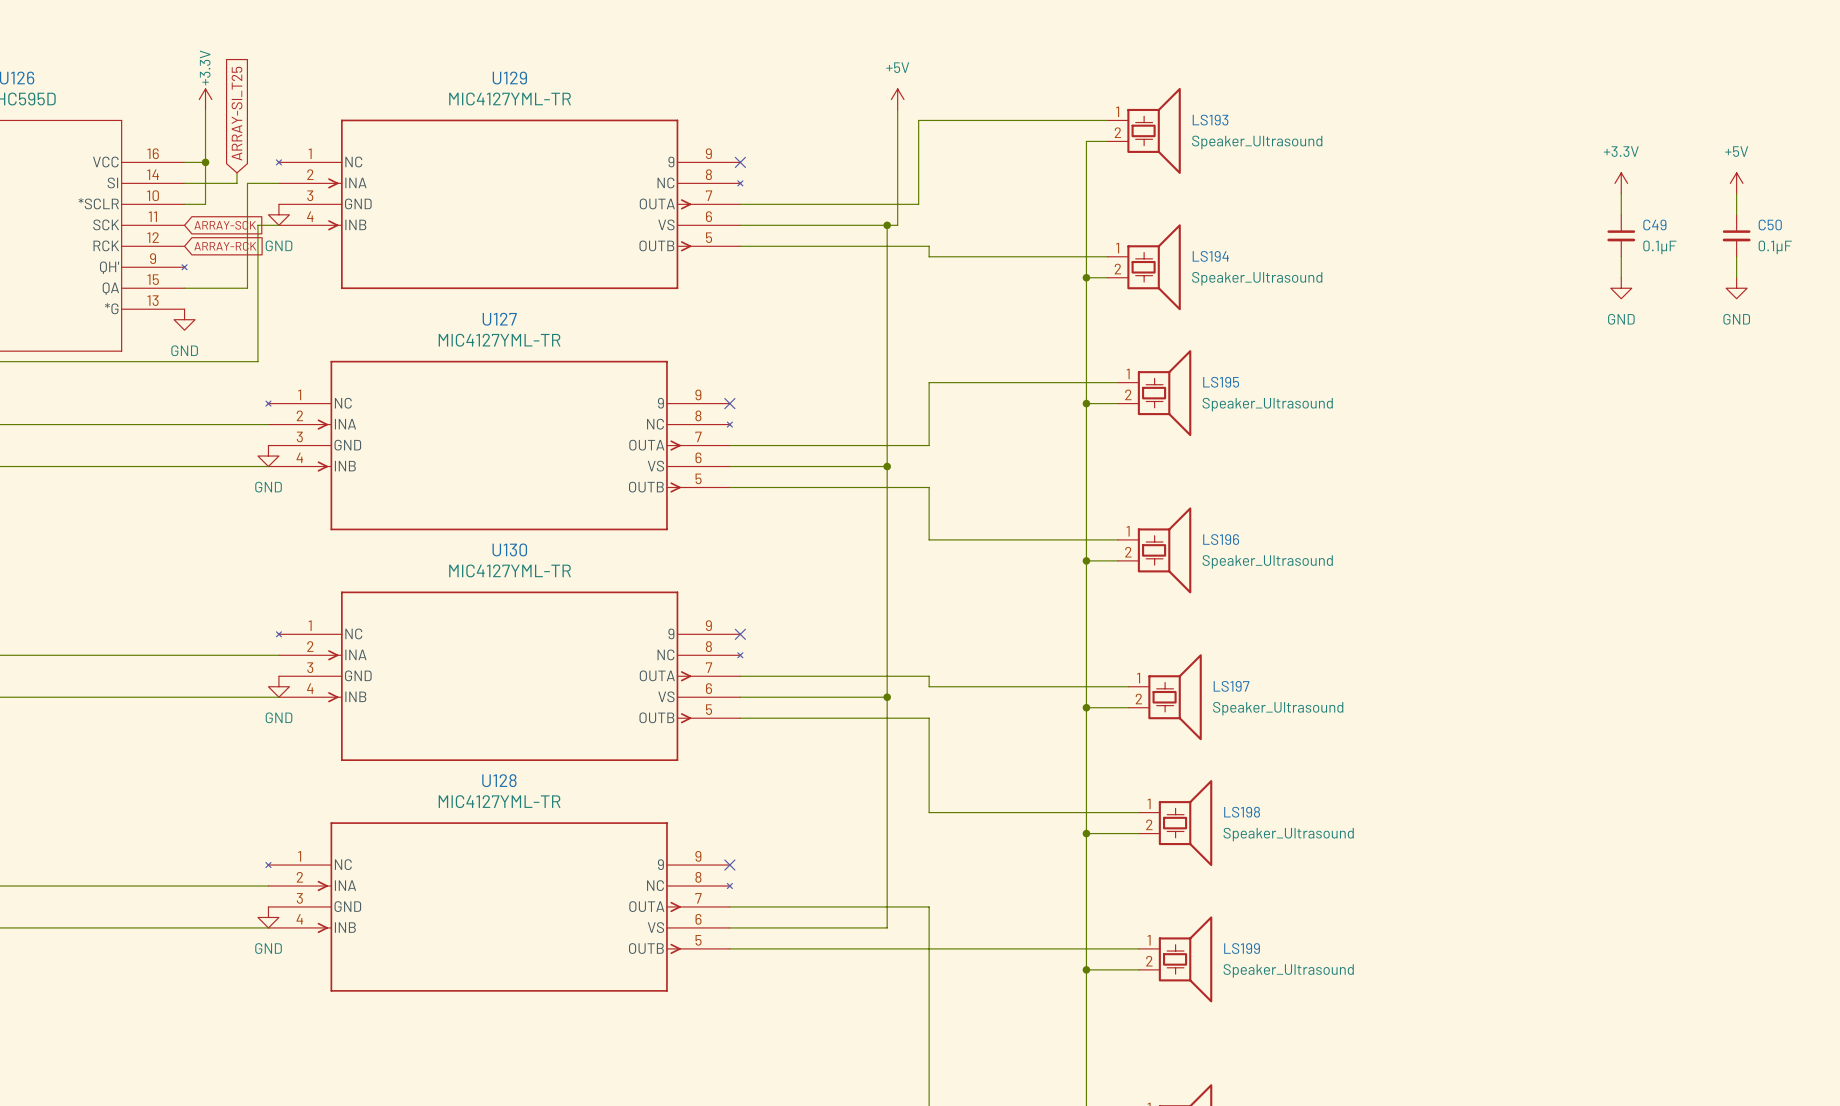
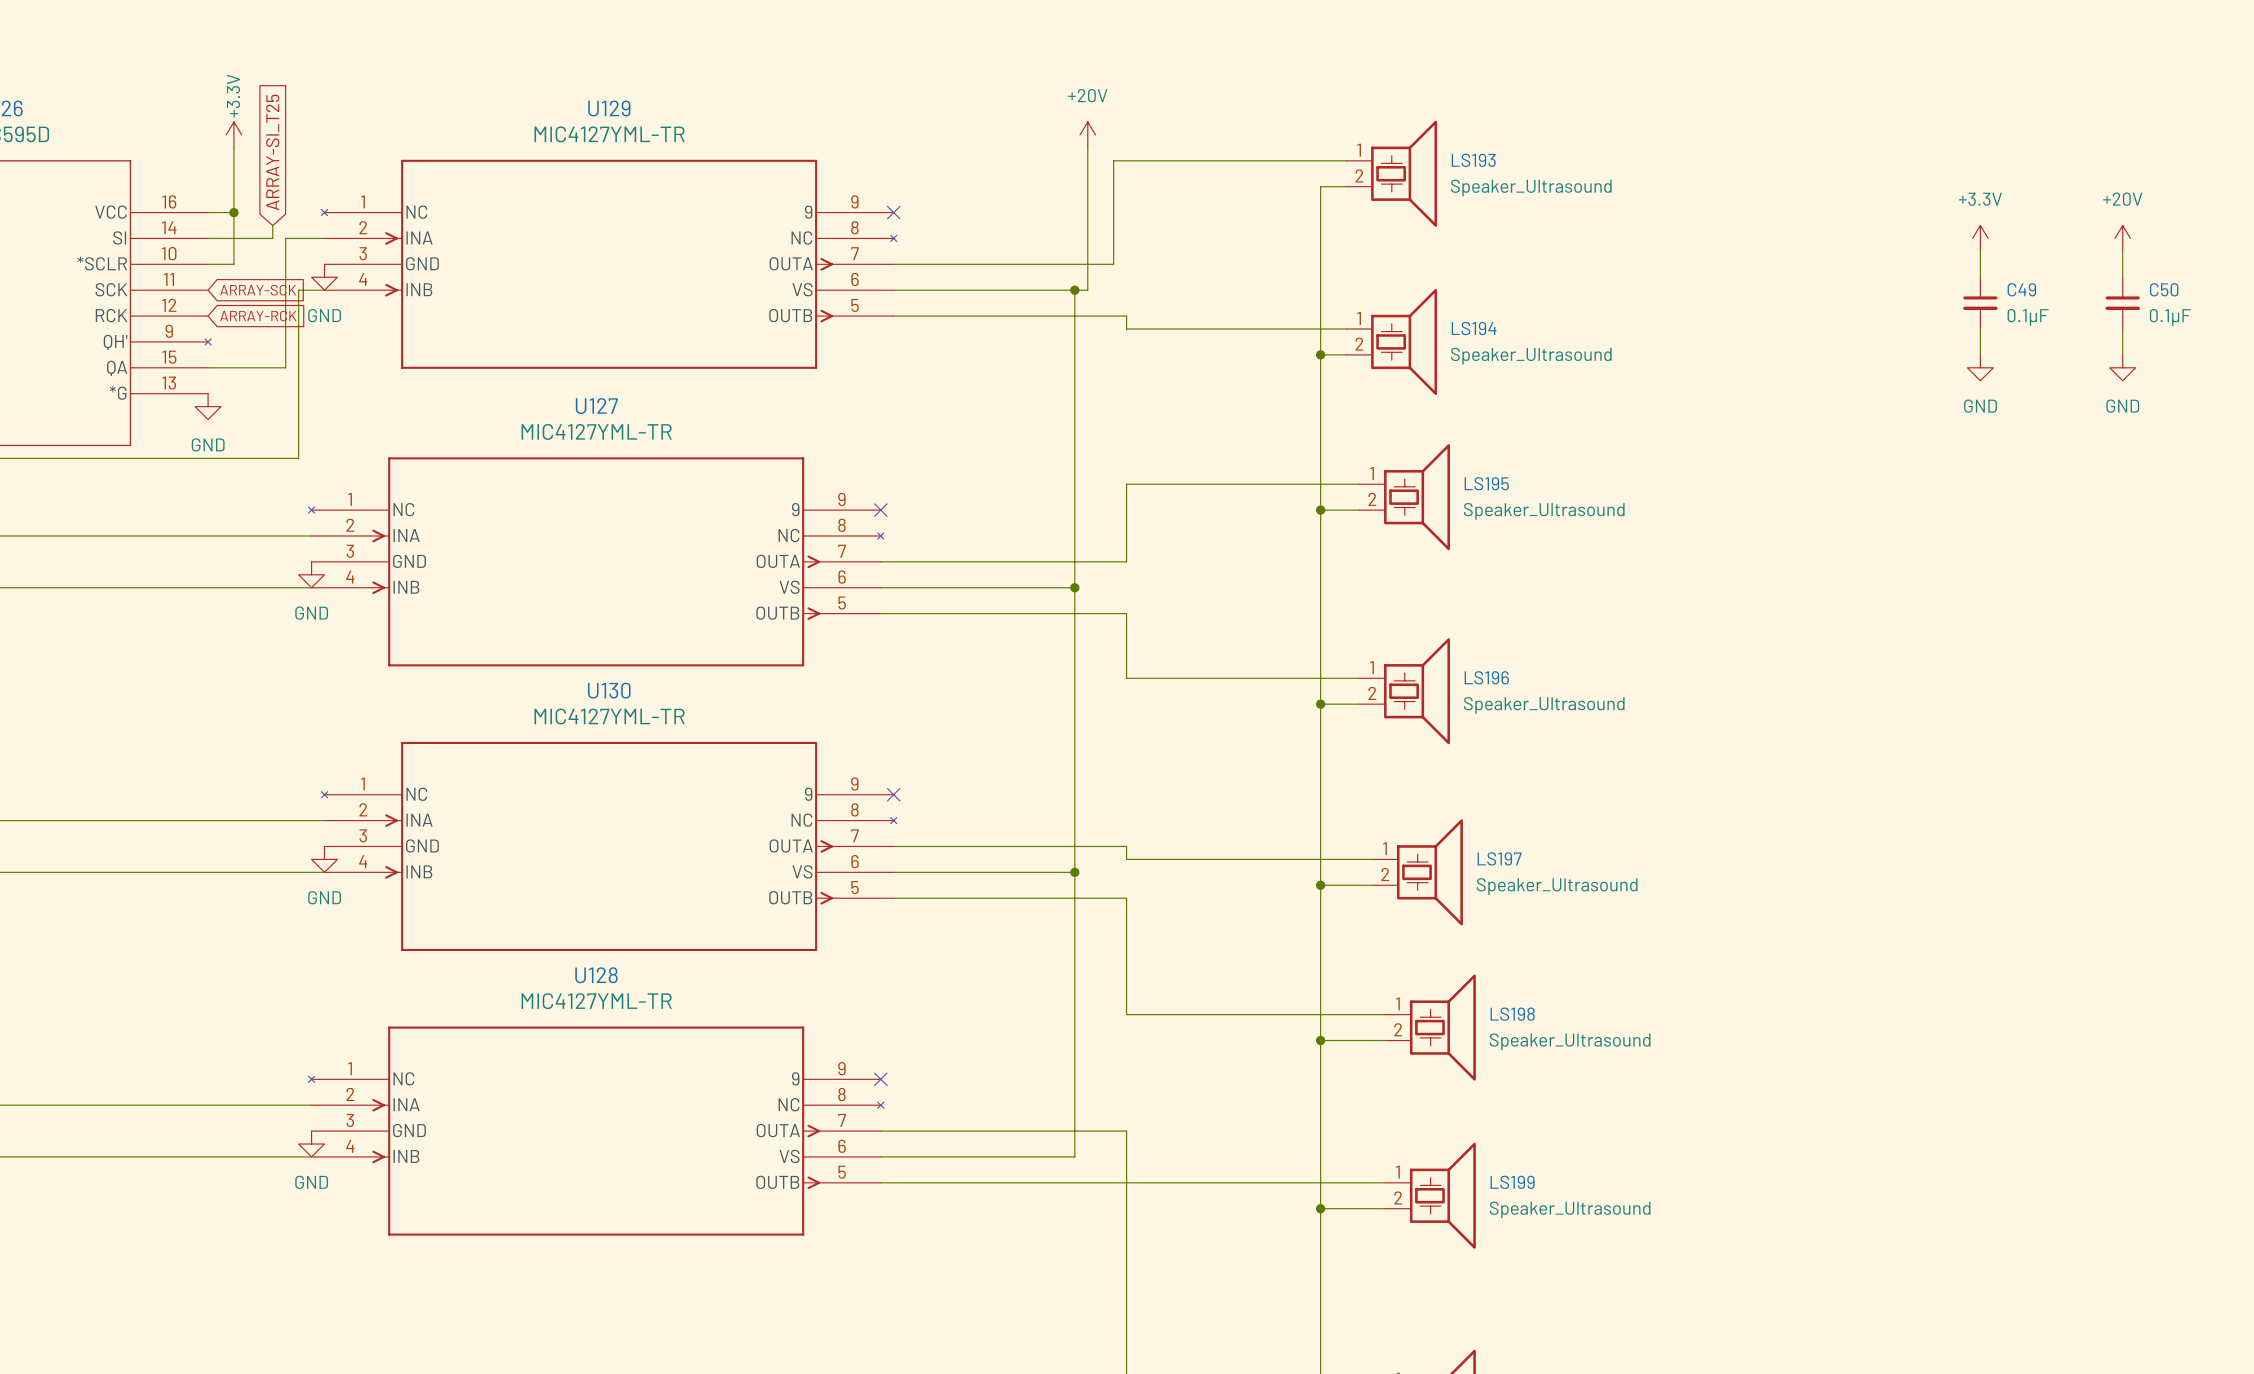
power symbol: +5V (897, 99) -> +20V (1087, 134)
power symbol: +5V (1736, 183) -> +20V (2122, 238)

